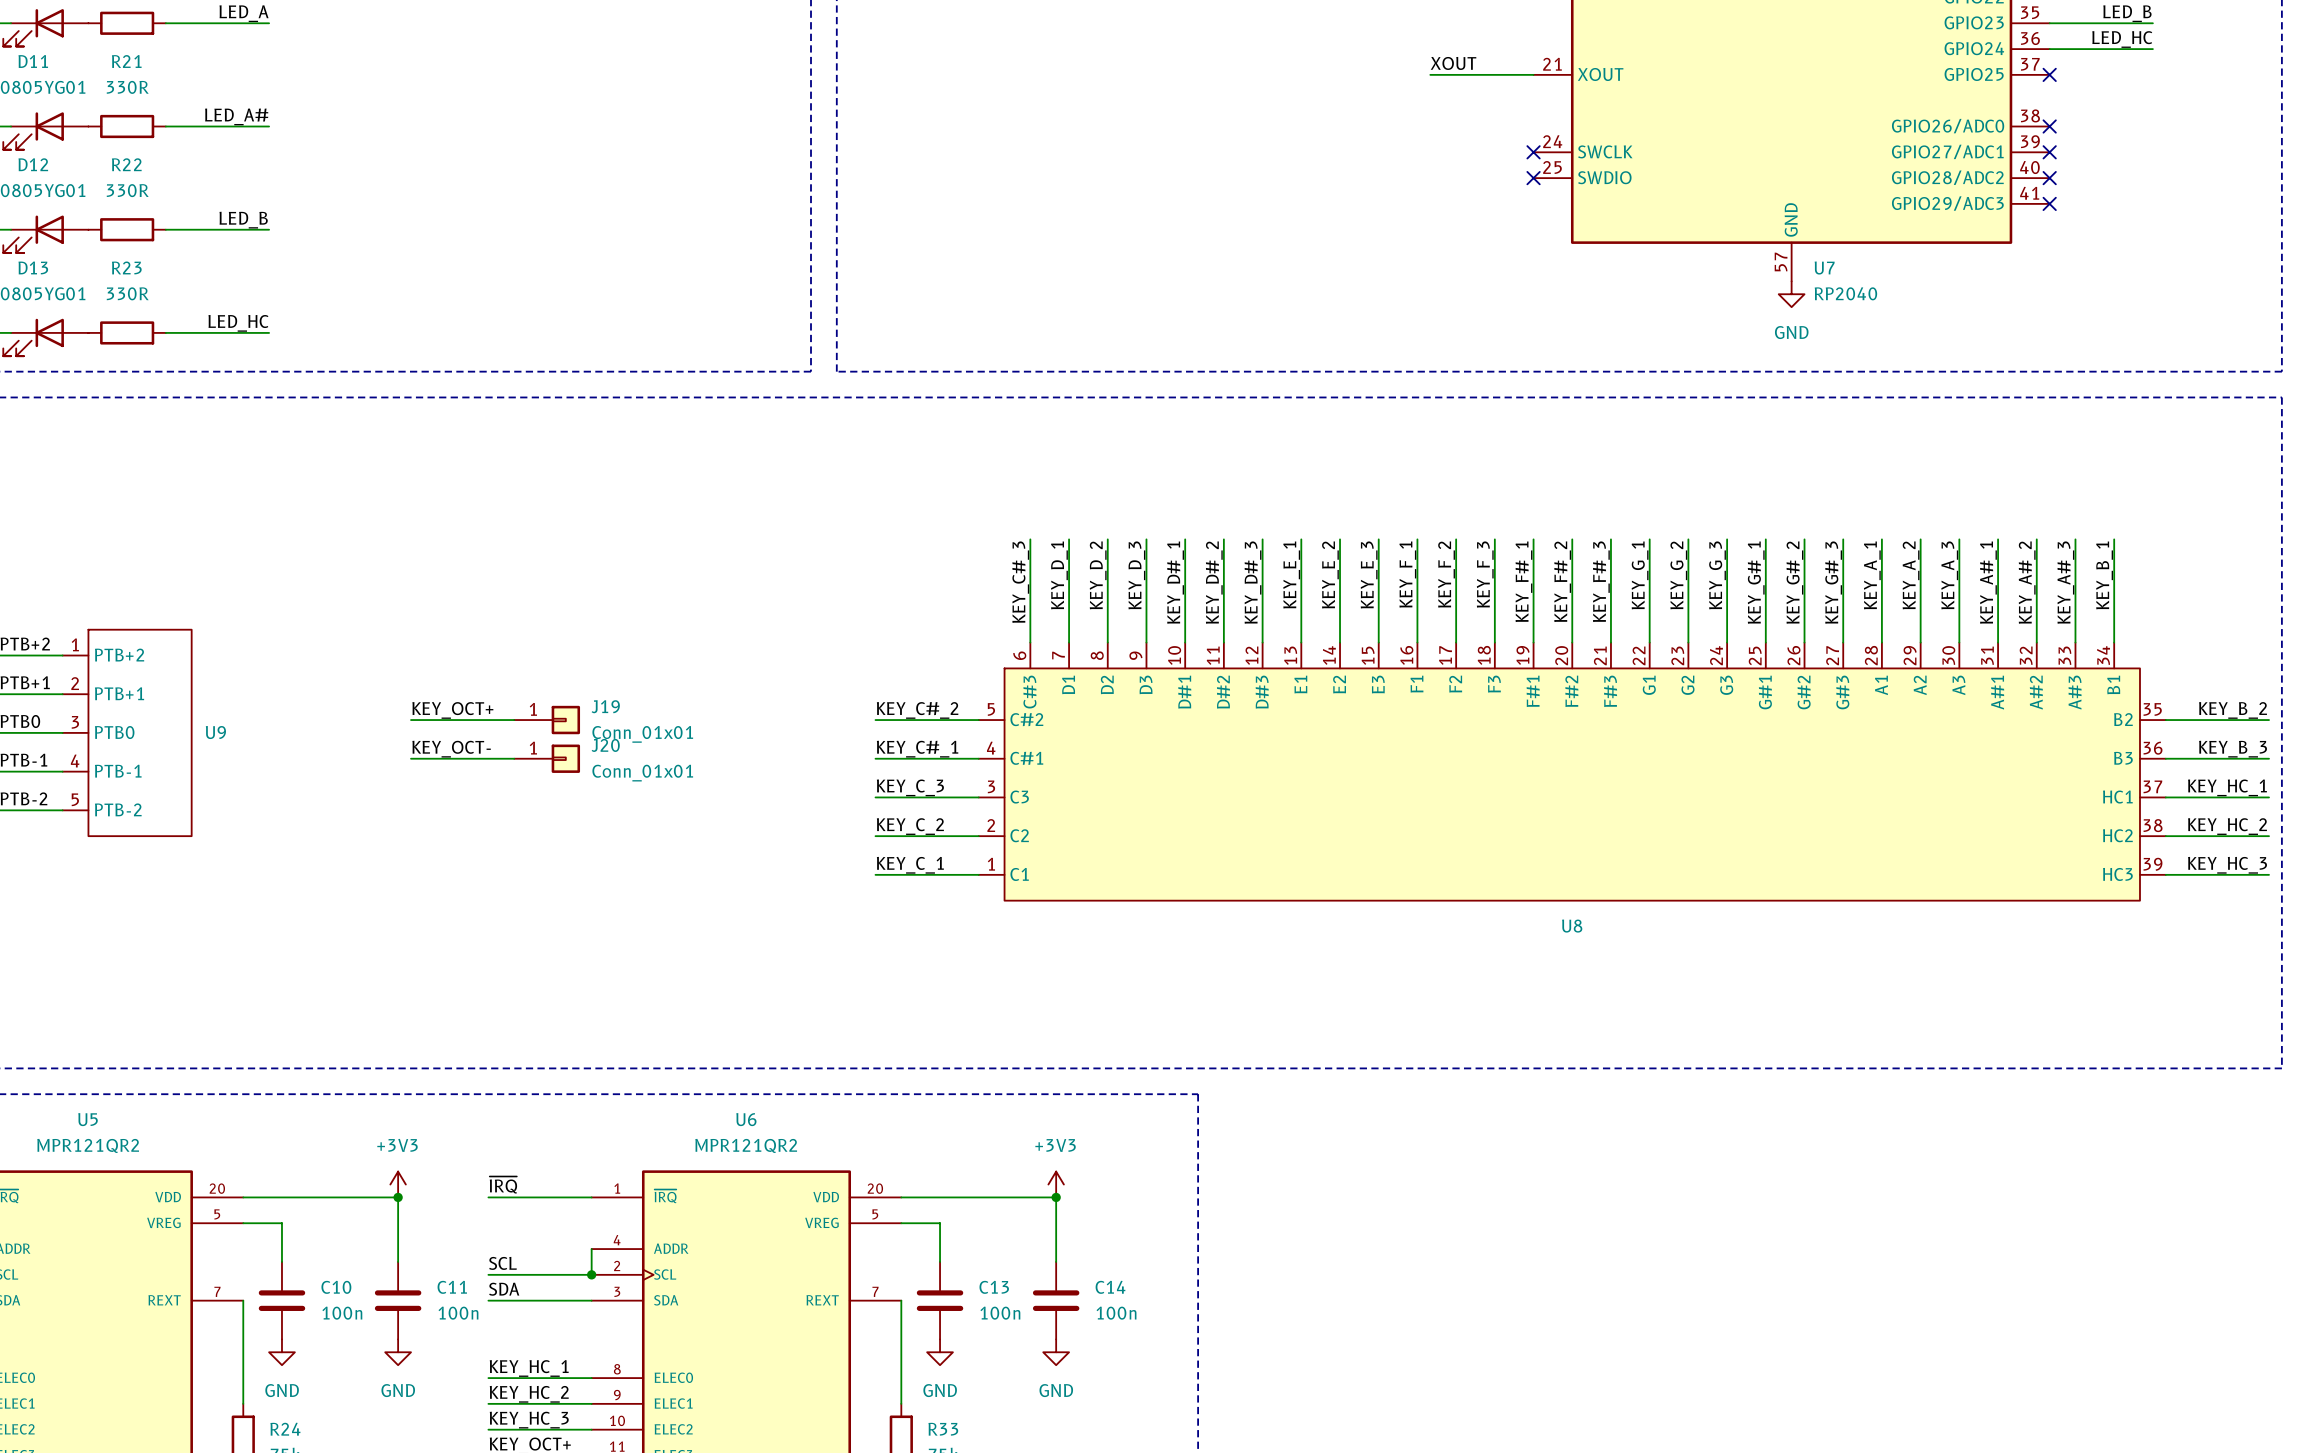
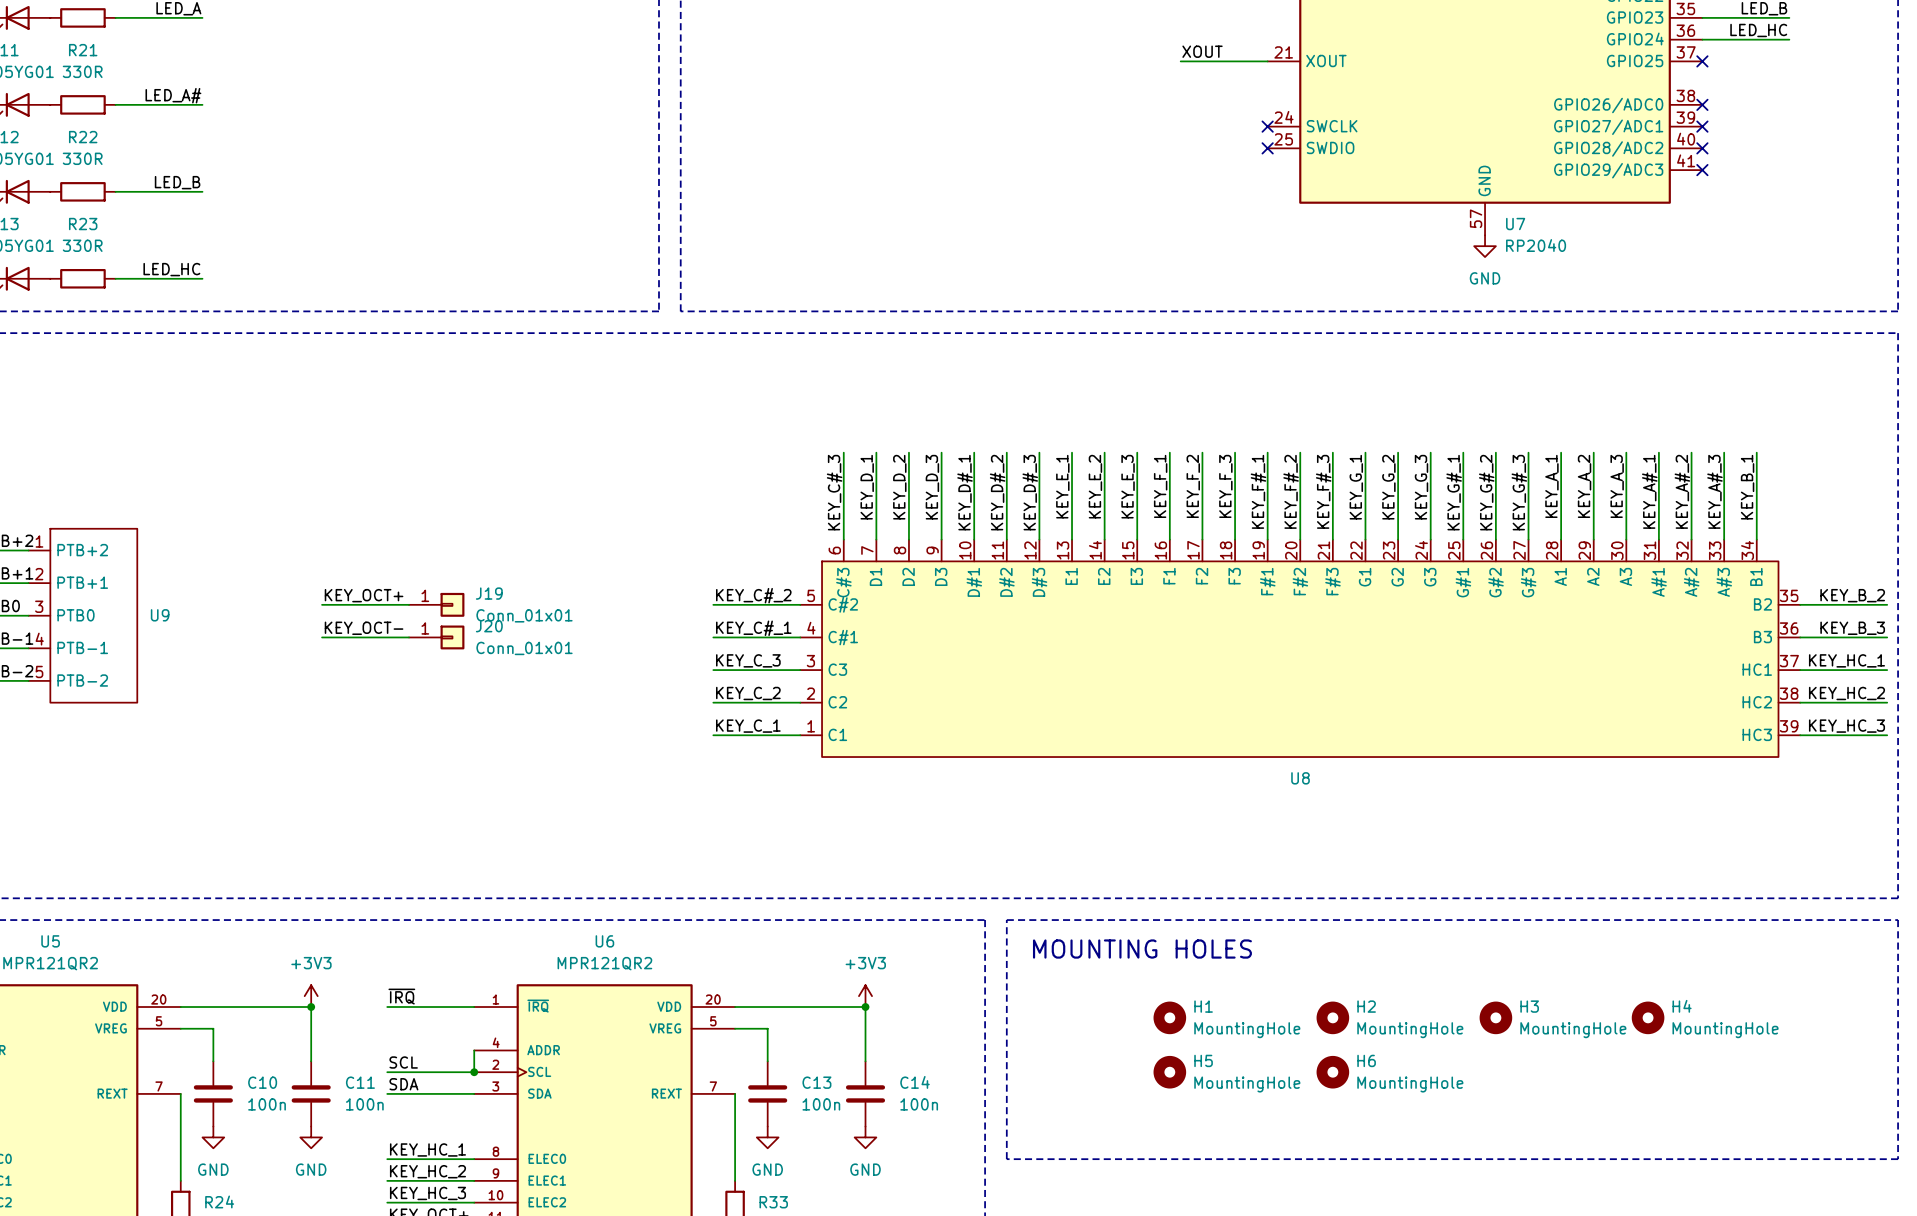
line: none -> (1006, 920) (1898, 920) (1898, 1159) (1006, 1159) (1006, 920)
text: none -> MOUNTING HOLES (1142, 949)
H1: none -> MountingHole (1169, 1017)
H2: none -> MountingHole (1332, 1017)
H3: none -> MountingHole (1495, 1017)
H4: none -> MountingHole (1648, 1017)
H5: none -> MountingHole (1169, 1072)
H6: none -> MountingHole (1332, 1072)

